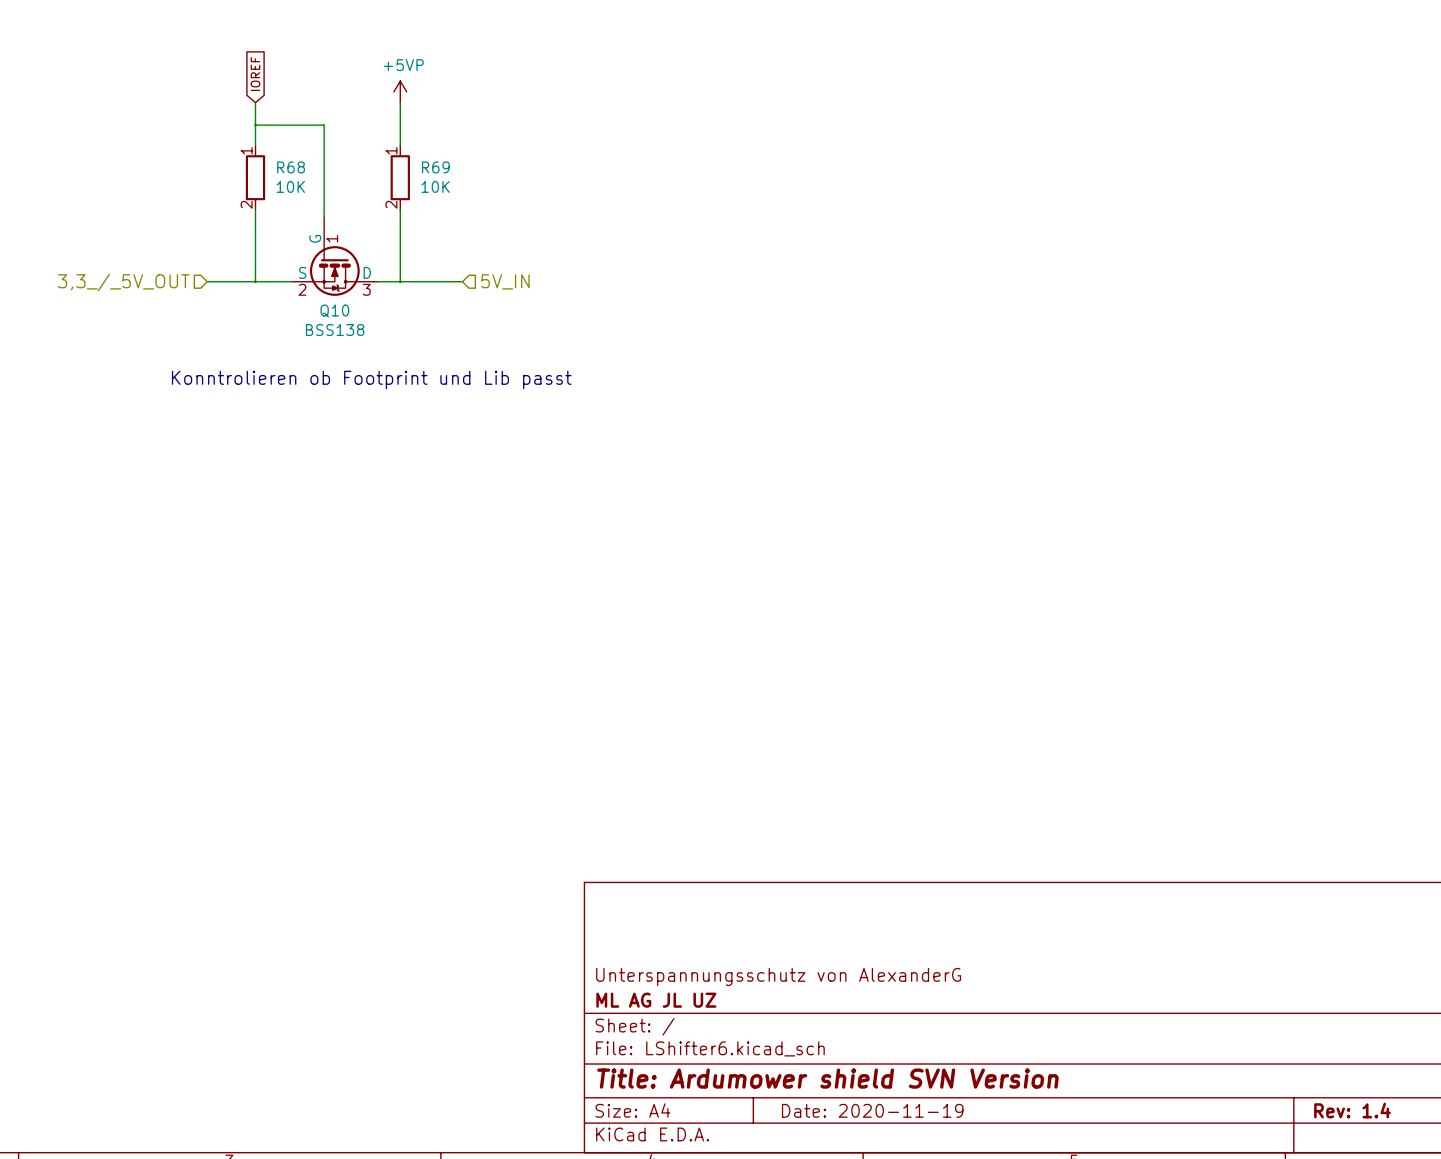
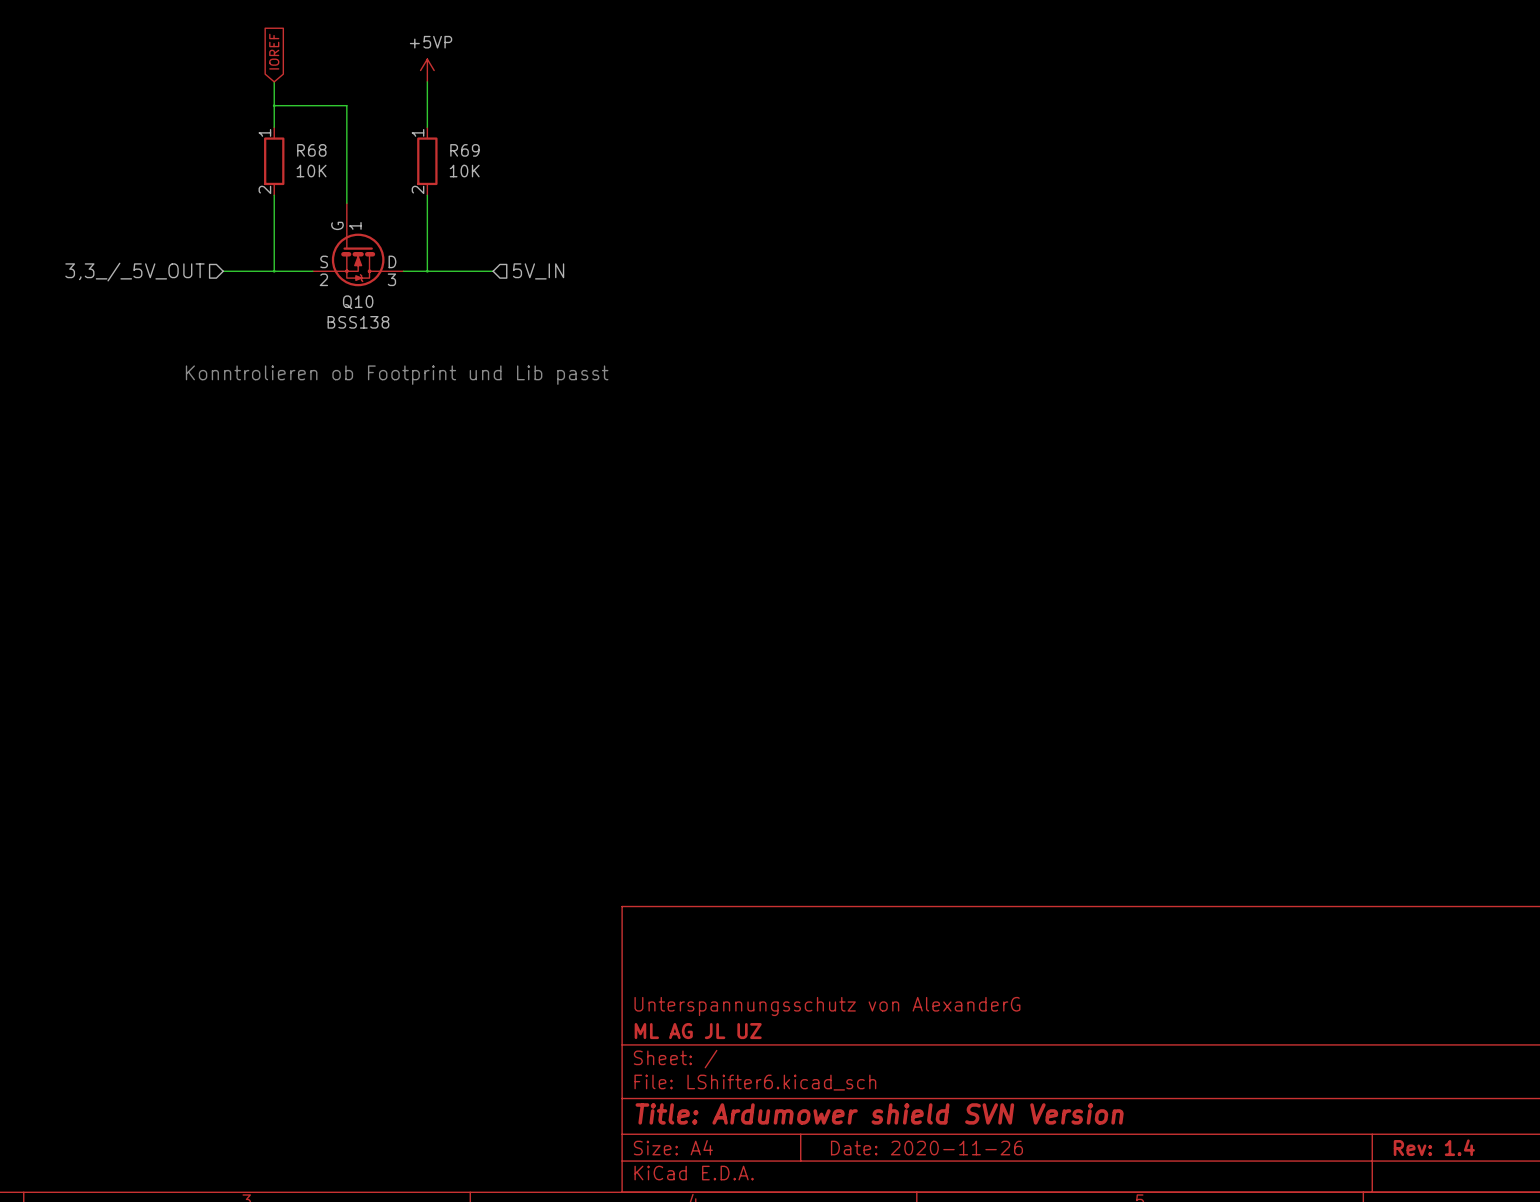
title block: Date: 2020-11-19 (872, 1110) -> Date: 2020-11-26 (926, 1148)

